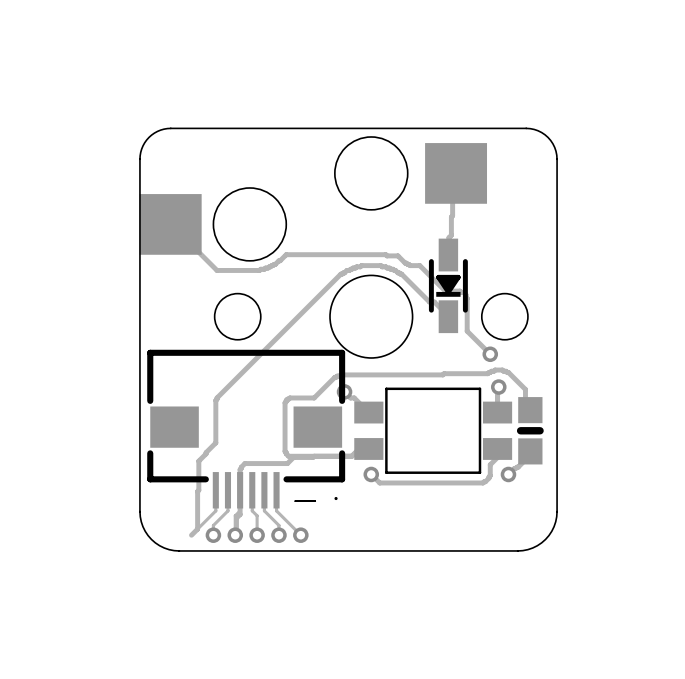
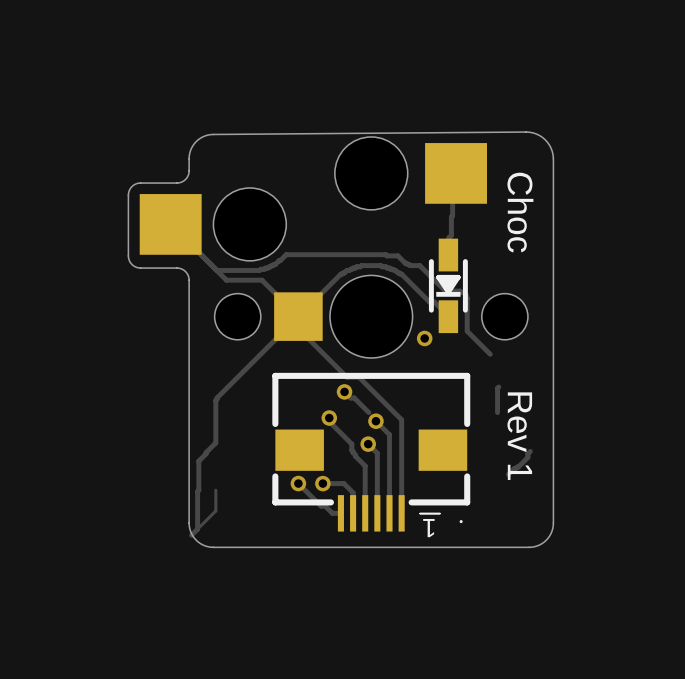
board edge: (170, 128) (526, 128) (538, 130) (548, 137) (554, 147) (557, 159) (557, 511) (554, 526) (545, 539) (532, 547) (517, 550) (179, 550) (164, 547) (151, 539) (142, 526) (139, 511) (139, 159) (143, 145) (148, 137) (160, 130) (170, 128) -> (526, 132) (210, 134) (200, 138) (192, 145) (189, 156) (188, 174) (183, 181) (138, 183) (130, 187) (128, 195) (130, 261) (138, 267) (180, 268) (186, 272) (189, 278) (189, 523) (191, 533) (198, 542) (213, 547) (529, 547) (539, 544) (548, 538) (553, 523) (553, 158) (551, 148) (545, 139) (536, 134) (526, 132)
text: none -> Choc (520, 212)
track: none -> (170, 224) (226, 280) (261, 280) (292, 310) (292, 322) (346, 377) (359, 377) (401, 419) (401, 513)
part: none -> (298, 316)
via: none -> (424, 338)
via: (490, 354) -> none
via: (498, 387) -> none
track: (530, 410) (525, 405) (525, 389) (508, 372) (502, 370) (495, 370) (487, 373) (340, 374) (334, 377) (314, 397) (289, 397) (286, 400) (285, 451) (288, 456) (351, 456) (359, 448) (368, 448) -> none
track: none -> (329, 418) (329, 421) (351, 444) (353, 452) (365, 465) (365, 513)
via: none -> (329, 418)
track: none -> (375, 421) (389, 434) (389, 513)
via: none -> (375, 421)
text: none -> Rev 1 (519, 436)
part: (246, 429) -> none
part: (433, 430) -> none
part: (530, 430) -> none
track: none -> (368, 444) (377, 453) (377, 513)
via: none -> (368, 444)
track: (497, 448) (497, 457) (490, 464) (490, 475) (482, 482) (379, 482) (371, 474) -> none
part: none -> (371, 452)
track: (314, 456) (293, 457) (287, 463) (244, 463) (240, 469) (240, 514) (236, 518) (235, 535) (235, 515) (240, 510) (240, 490) -> none
via: (371, 474) -> none
via: (508, 474) -> none
track: none -> (298, 483) (320, 506) (325, 506) (332, 513) (340, 513)
via: none -> (298, 483)
track: none -> (322, 483) (343, 483) (353, 492) (353, 513)
via: none -> (322, 483)
track: (227, 490) (227, 510) (213, 525) (213, 535) -> none
track: (252, 490) (252, 510) (257, 515) (257, 535) -> none
track: (264, 490) (264, 510) (278, 525) (278, 535) -> none
track: (276, 490) (276, 510) (300, 535) -> none
via: (213, 535) -> none
via: (235, 535) -> none
via: (257, 535) -> none
via: (278, 535) -> none
via: (300, 535) -> none

